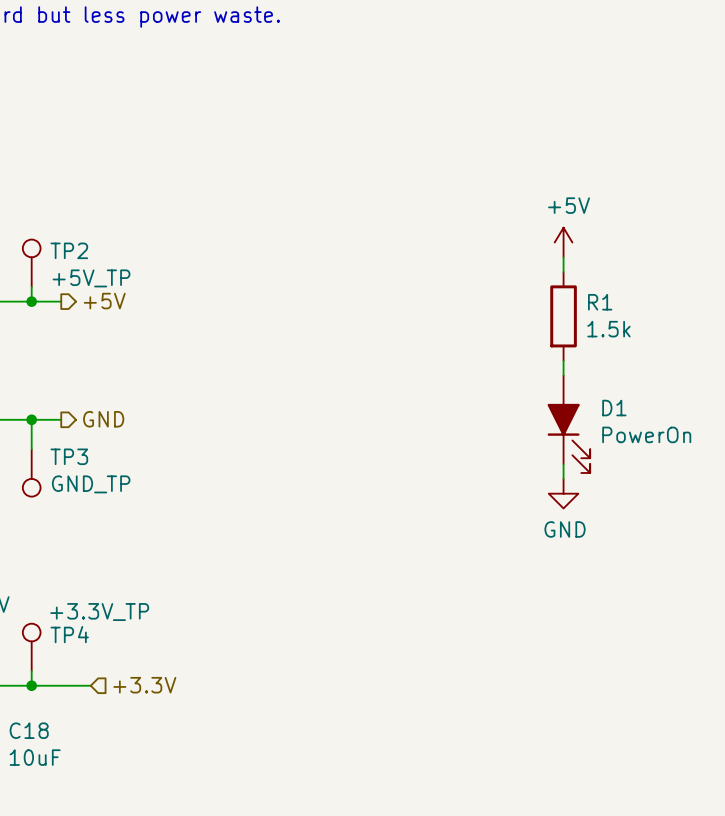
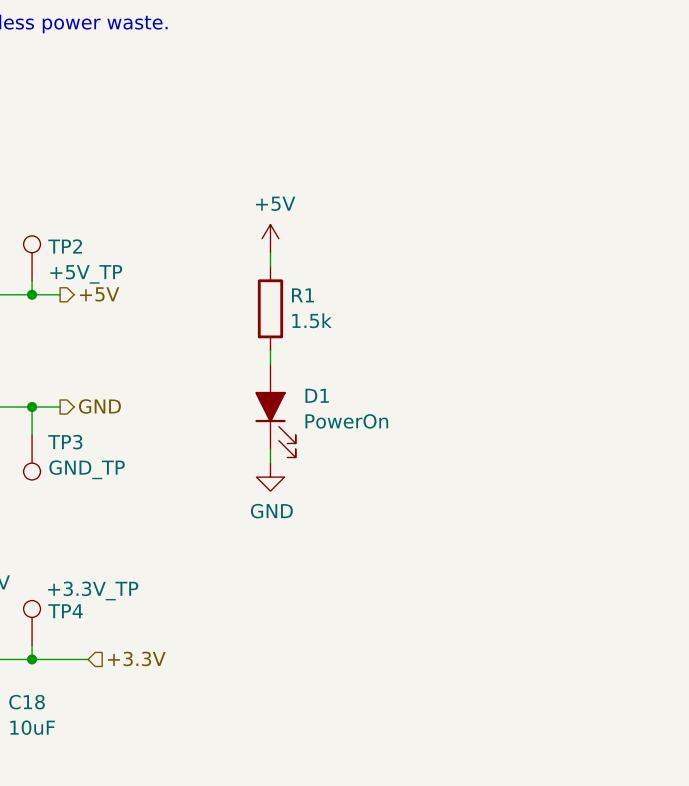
power symbol position: +5V (563, 242) -> +5V (270, 238)
wire: (563, 257) (563, 272) -> (270, 252) (270, 266)
R1 position: (563, 316) -> (270, 308)
wire: (563, 360) (563, 375) -> (270, 350) (270, 364)
D1 position: (568, 424) -> (275, 411)
wire: (563, 464) (563, 478) -> (270, 449) (270, 463)
power symbol position: GND (563, 493) -> GND (270, 477)

